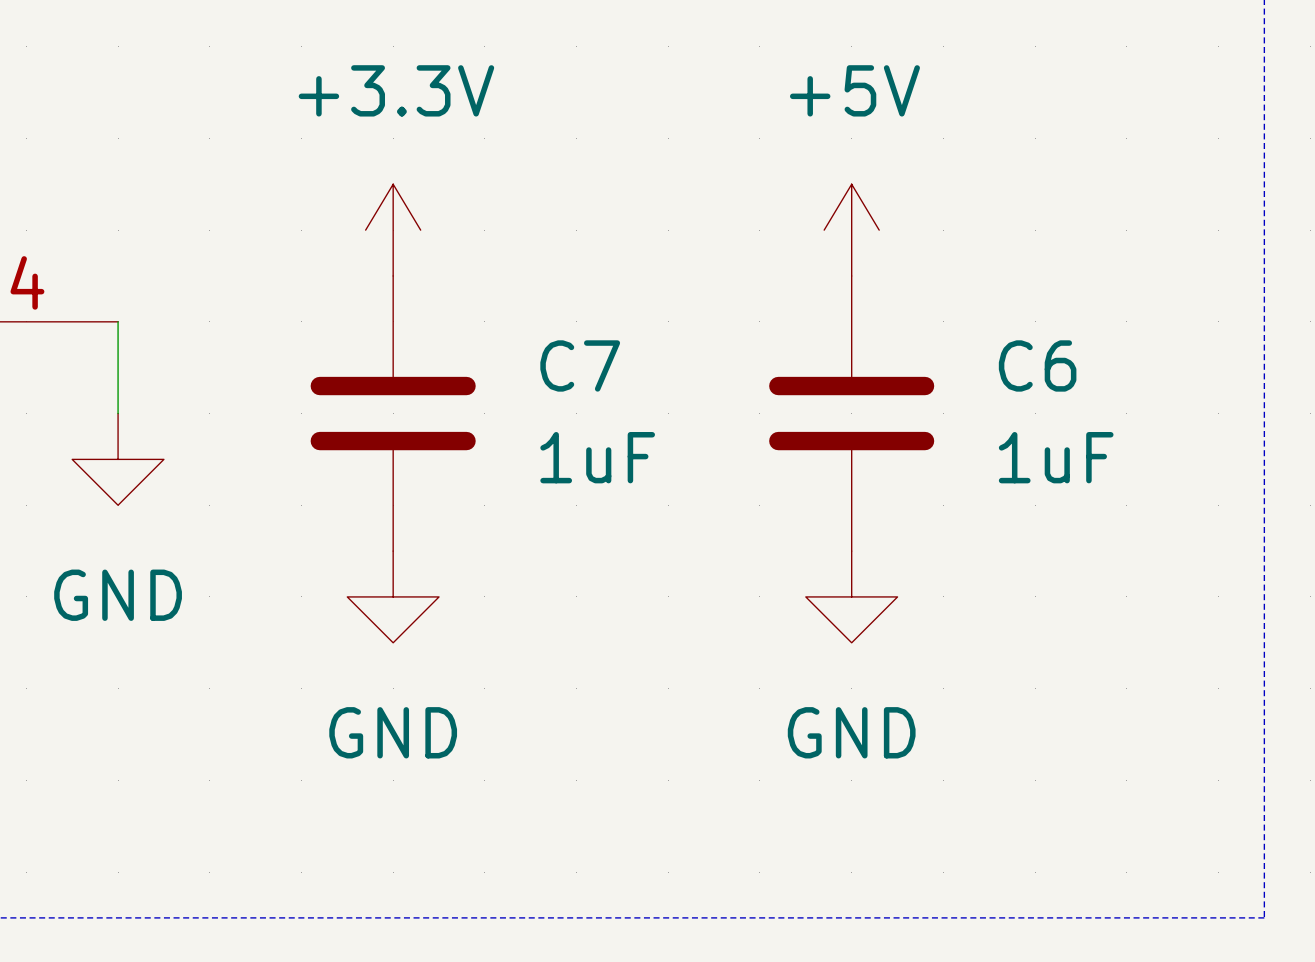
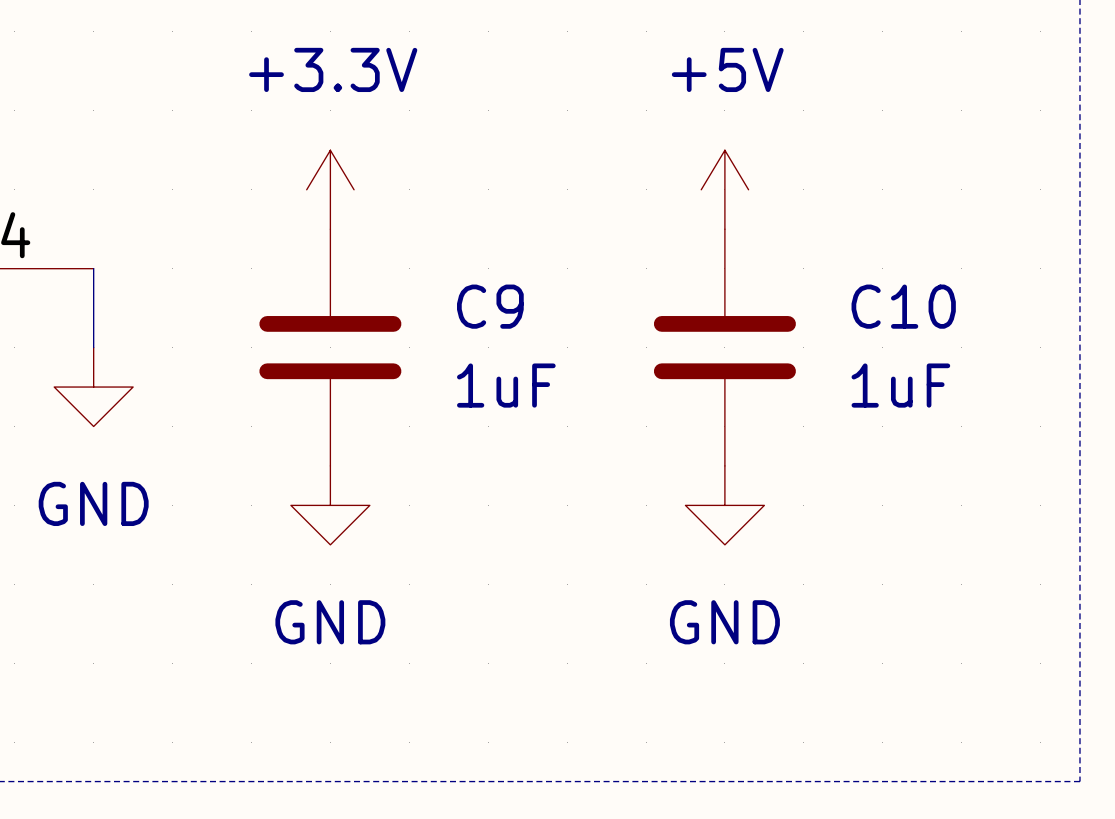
C7 name: C7 (580, 365) -> C9 (490, 306)
C6 name: C6 (1037, 365) -> C10 (903, 306)

